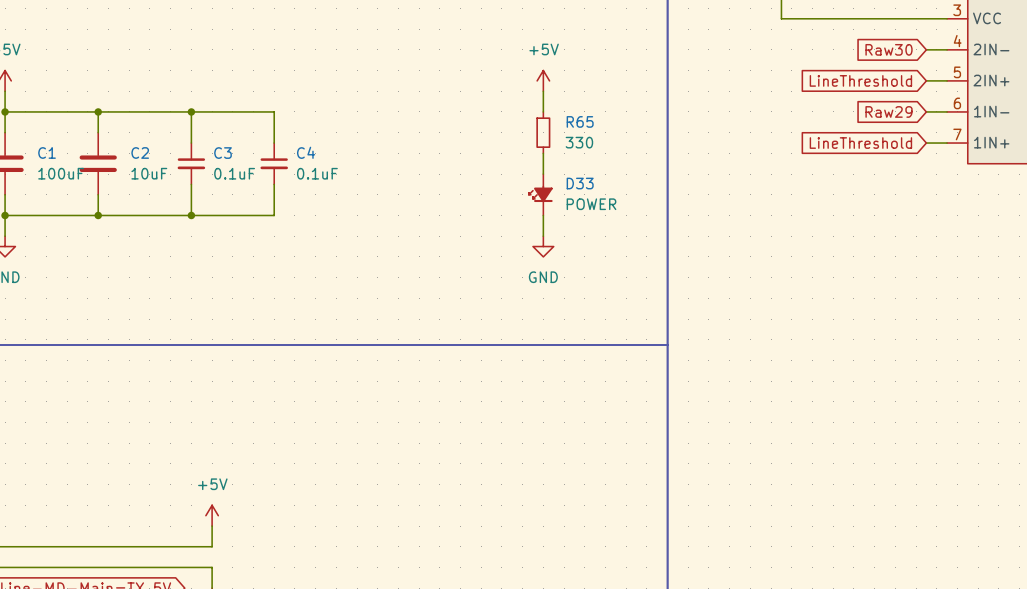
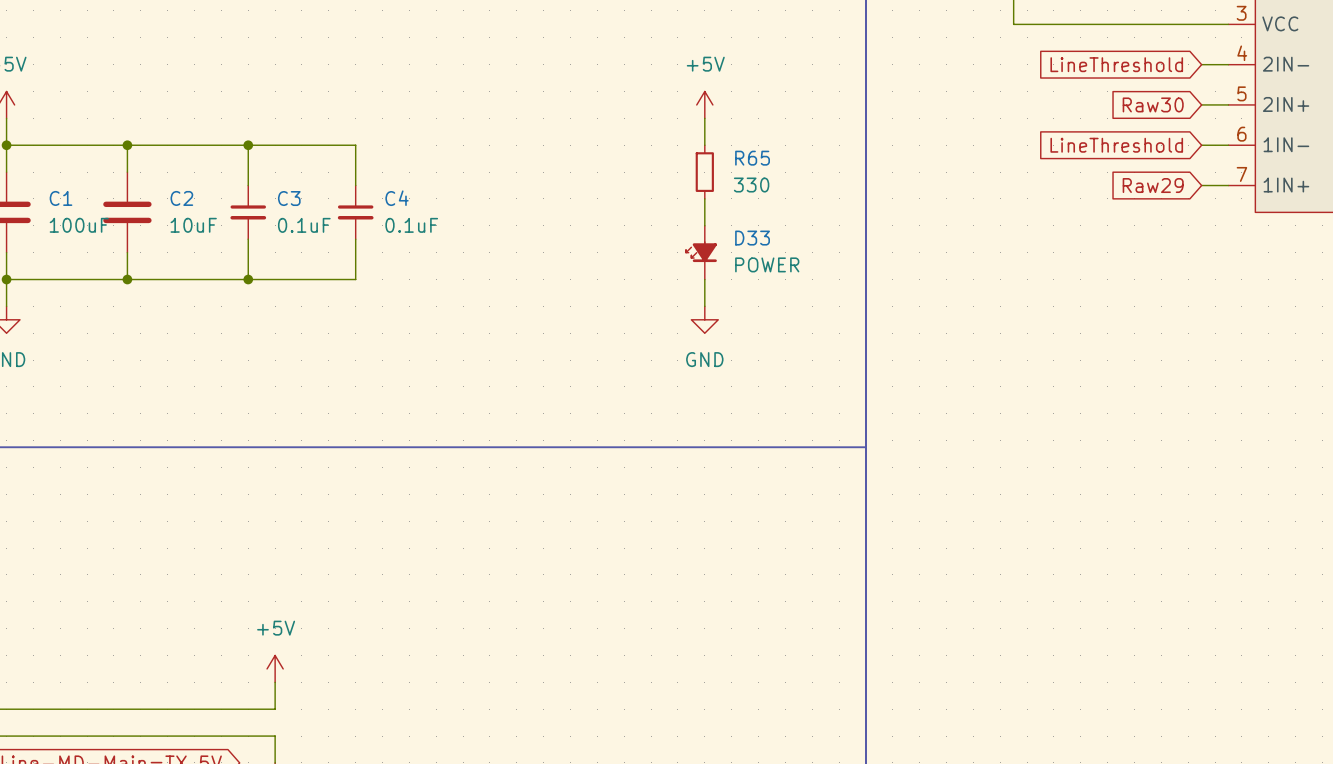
global label: Raw30 (889, 49) -> LineThreshold (1116, 64)
global label: LineThreshold (860, 80) -> Raw30 (1153, 104)
global label: Raw29 (889, 111) -> LineThreshold (1116, 145)
global label: LineThreshold (860, 143) -> Raw29 (1153, 185)

